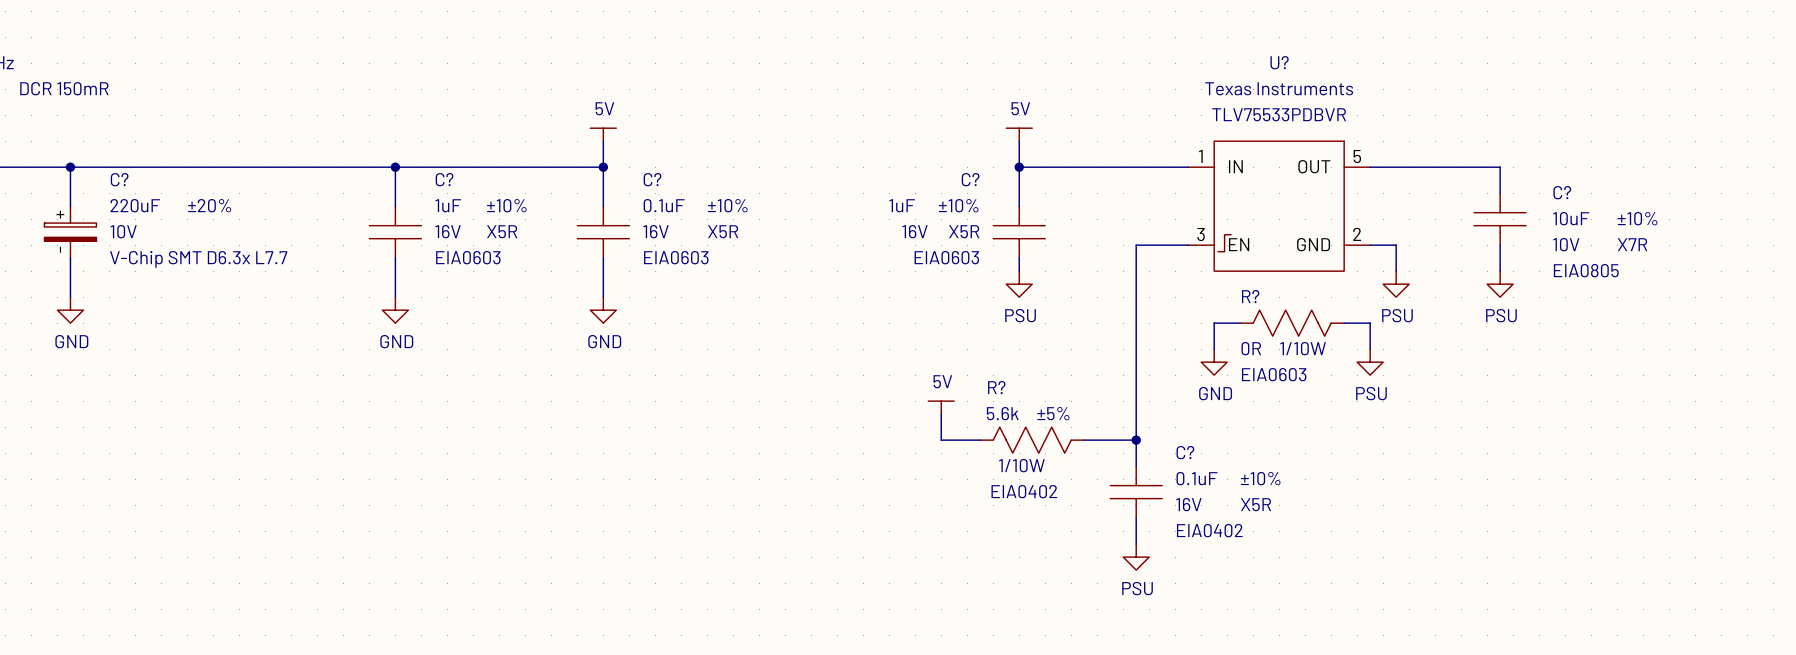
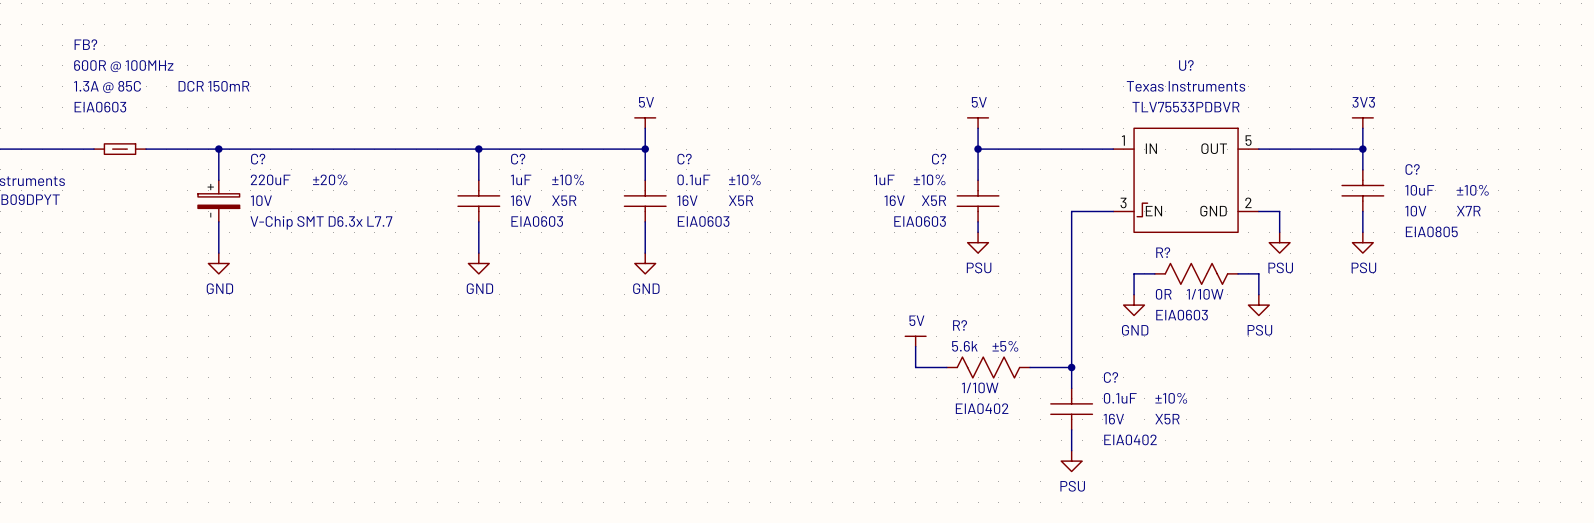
power symbol: none -> 3V3 (1362, 123)
wire: none -> (1362, 128) (1362, 149)
junction: none -> (1362, 149)

